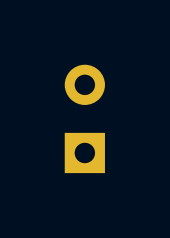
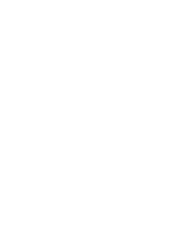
part: (84, 118) -> none

